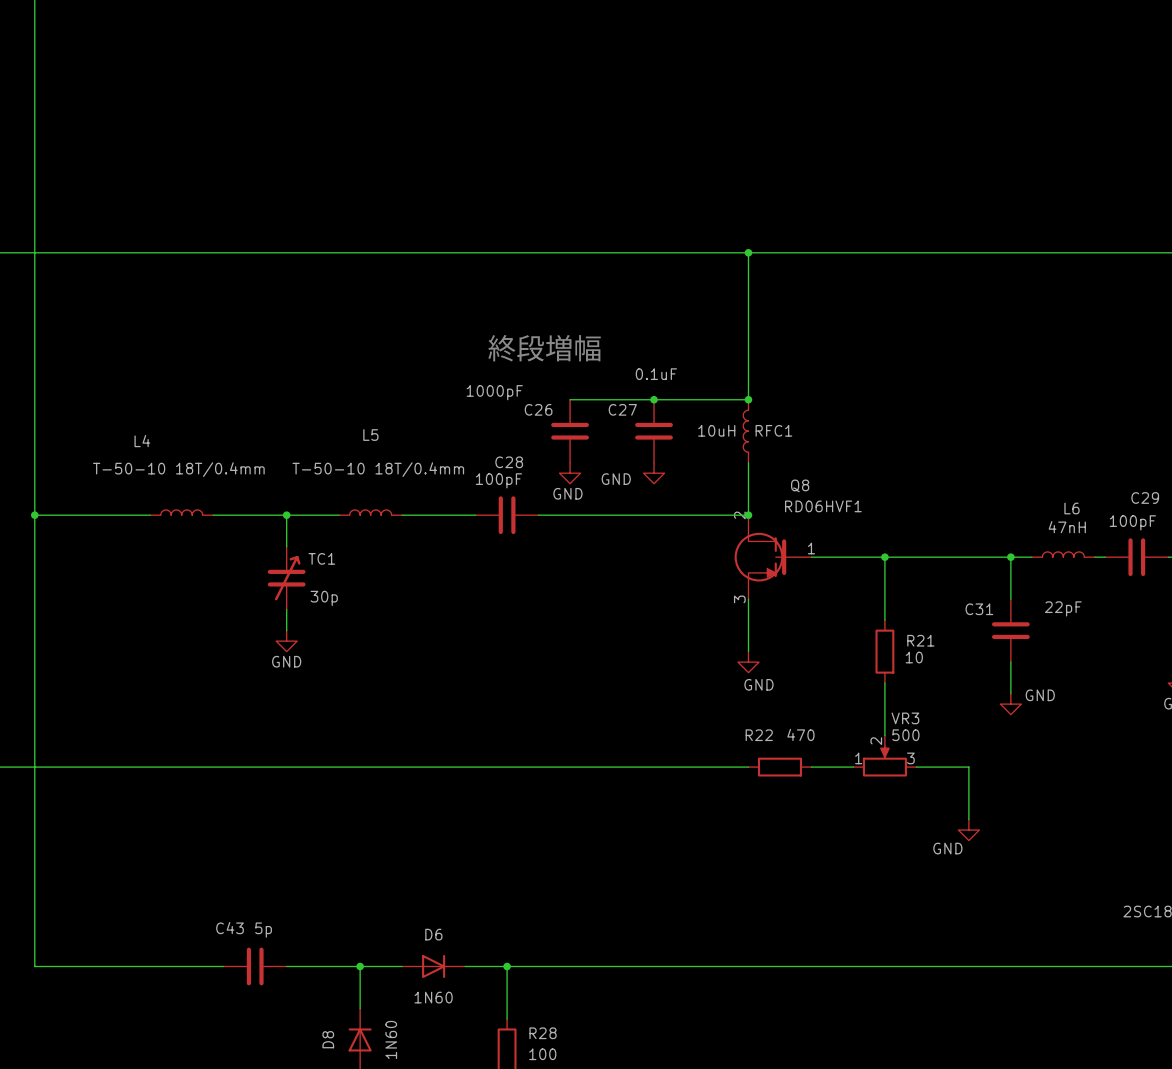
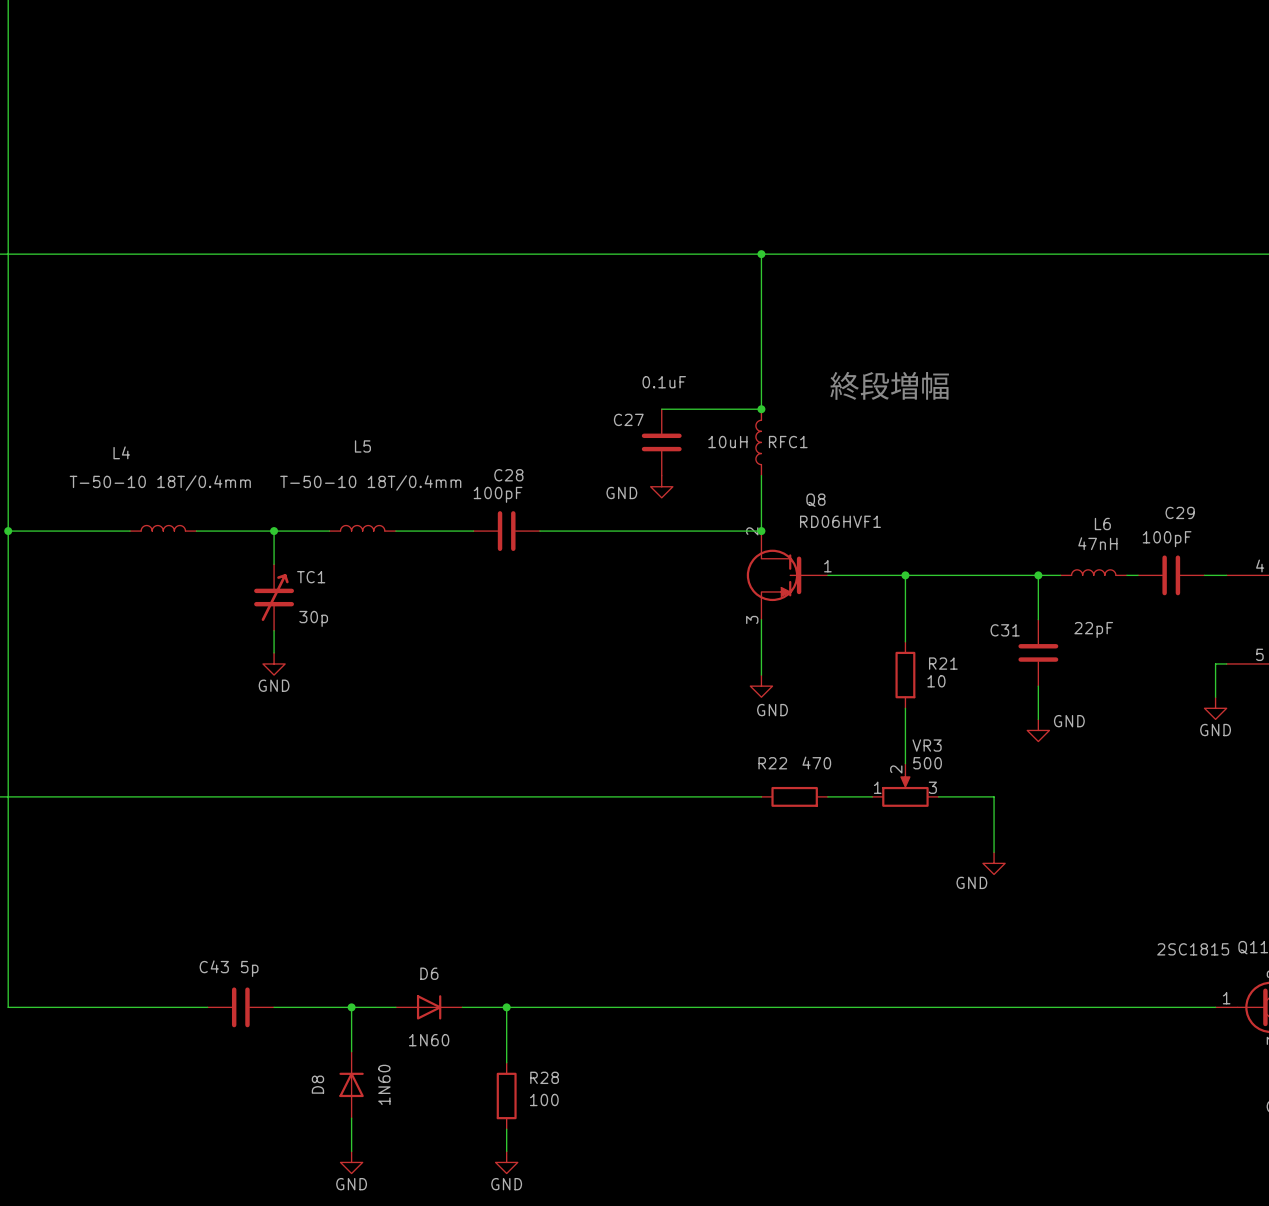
text: 終段増幅 (544, 348) -> none
text: none -> 終段増幅 (889, 385)
wire: (570, 399) (654, 399) -> none
junction: (654, 399) -> none
C26: 1000pF (570, 431) -> none
power symbol: GND (570, 473) -> none

